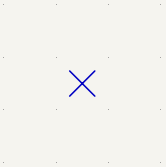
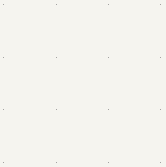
no-connect mark: (82, 83) -> none

